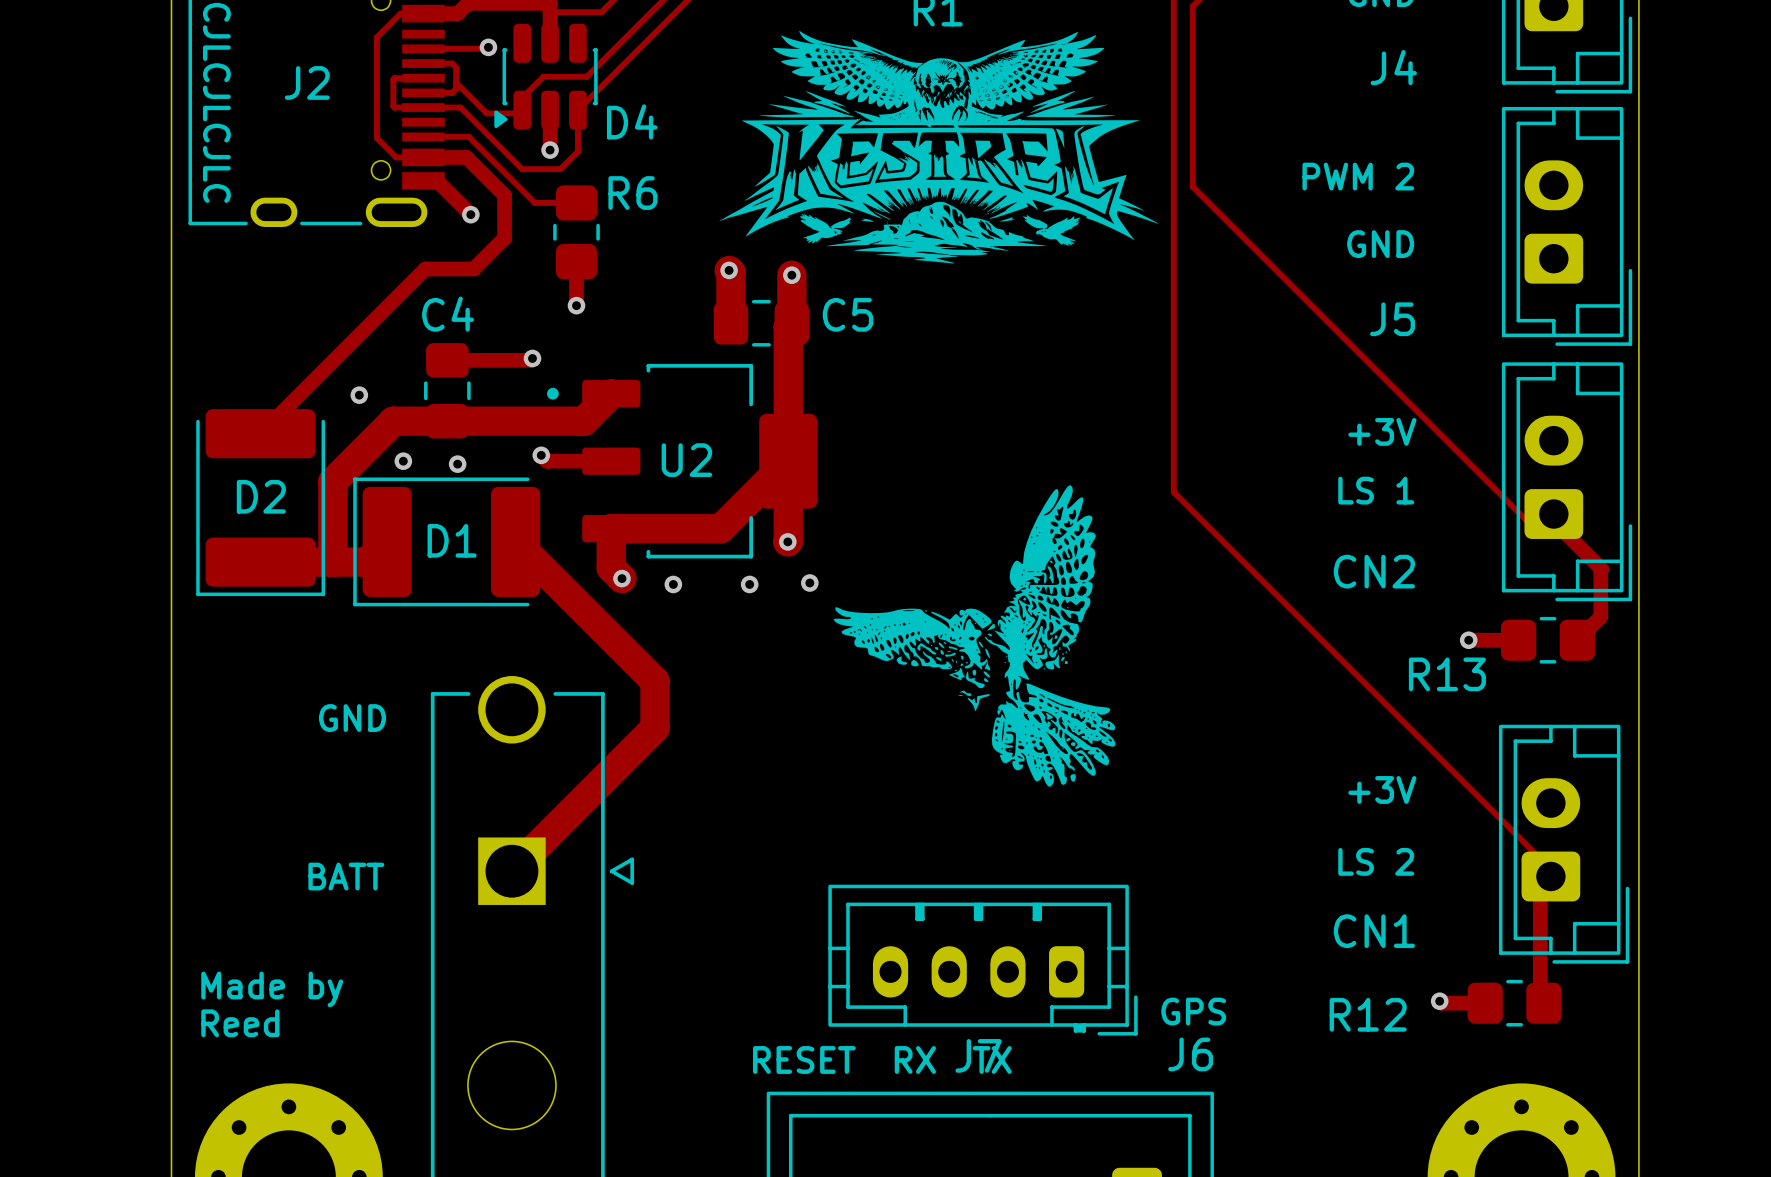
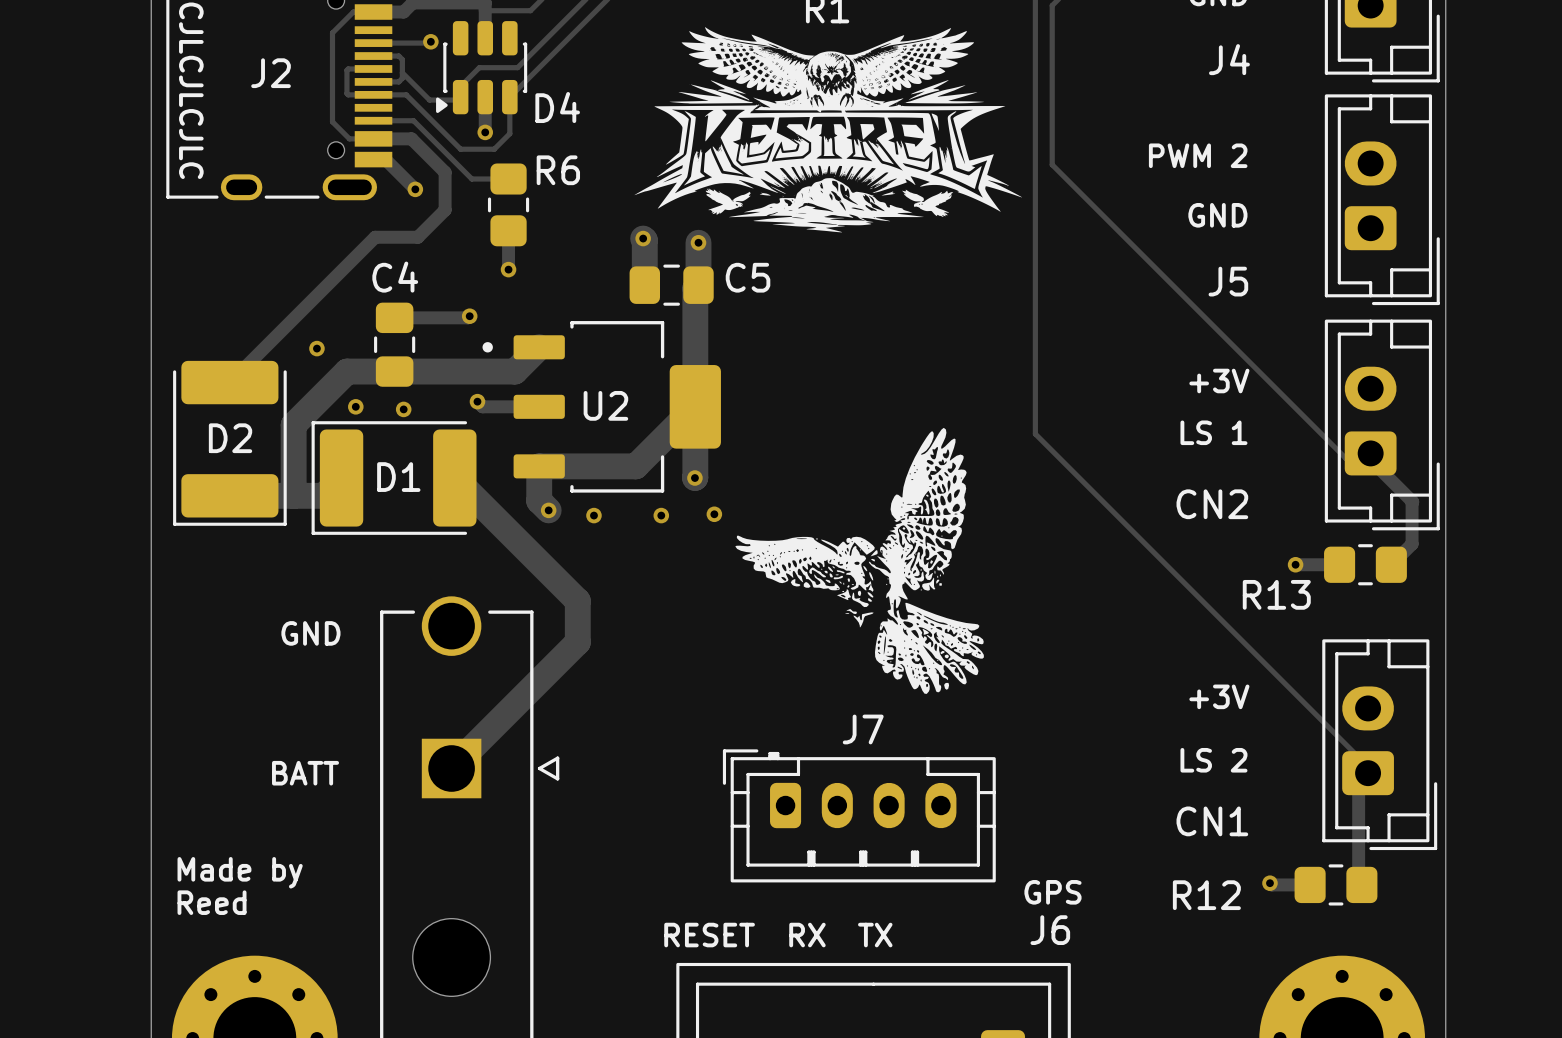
J7 rotation: 0° (982, 960) -> 180° (859, 815)

